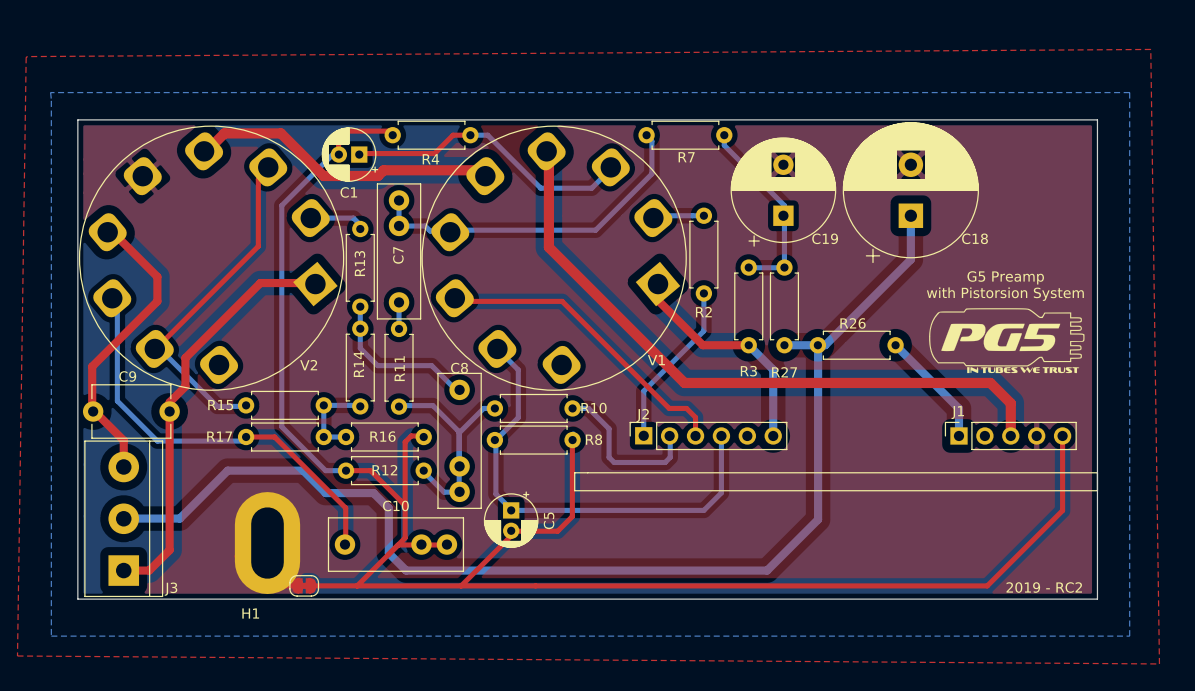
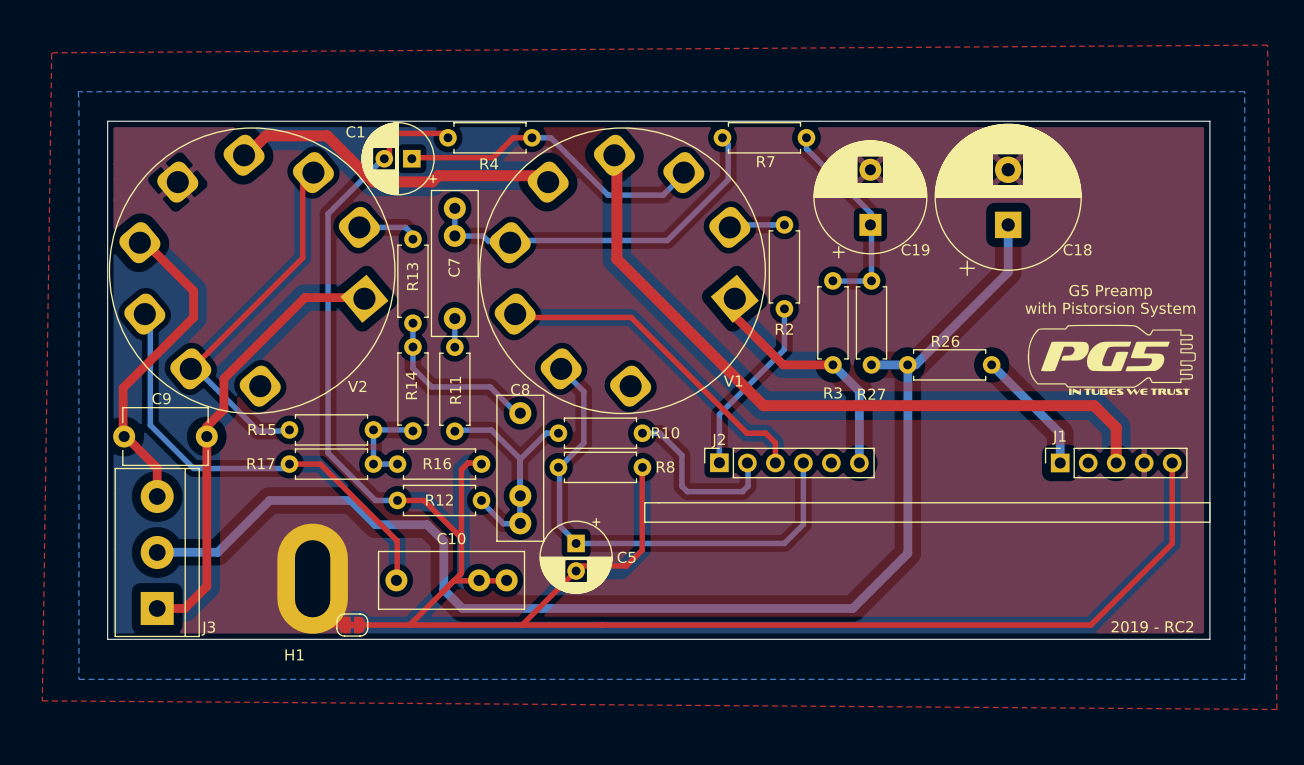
C1 footprint: [321, 127, 379, 182] -> [361, 122, 438, 196]
C1 name position: C1 (348, 192) -> C1 (355, 131)
C5 footprint: [483, 491, 539, 548] -> [539, 517, 613, 594]

